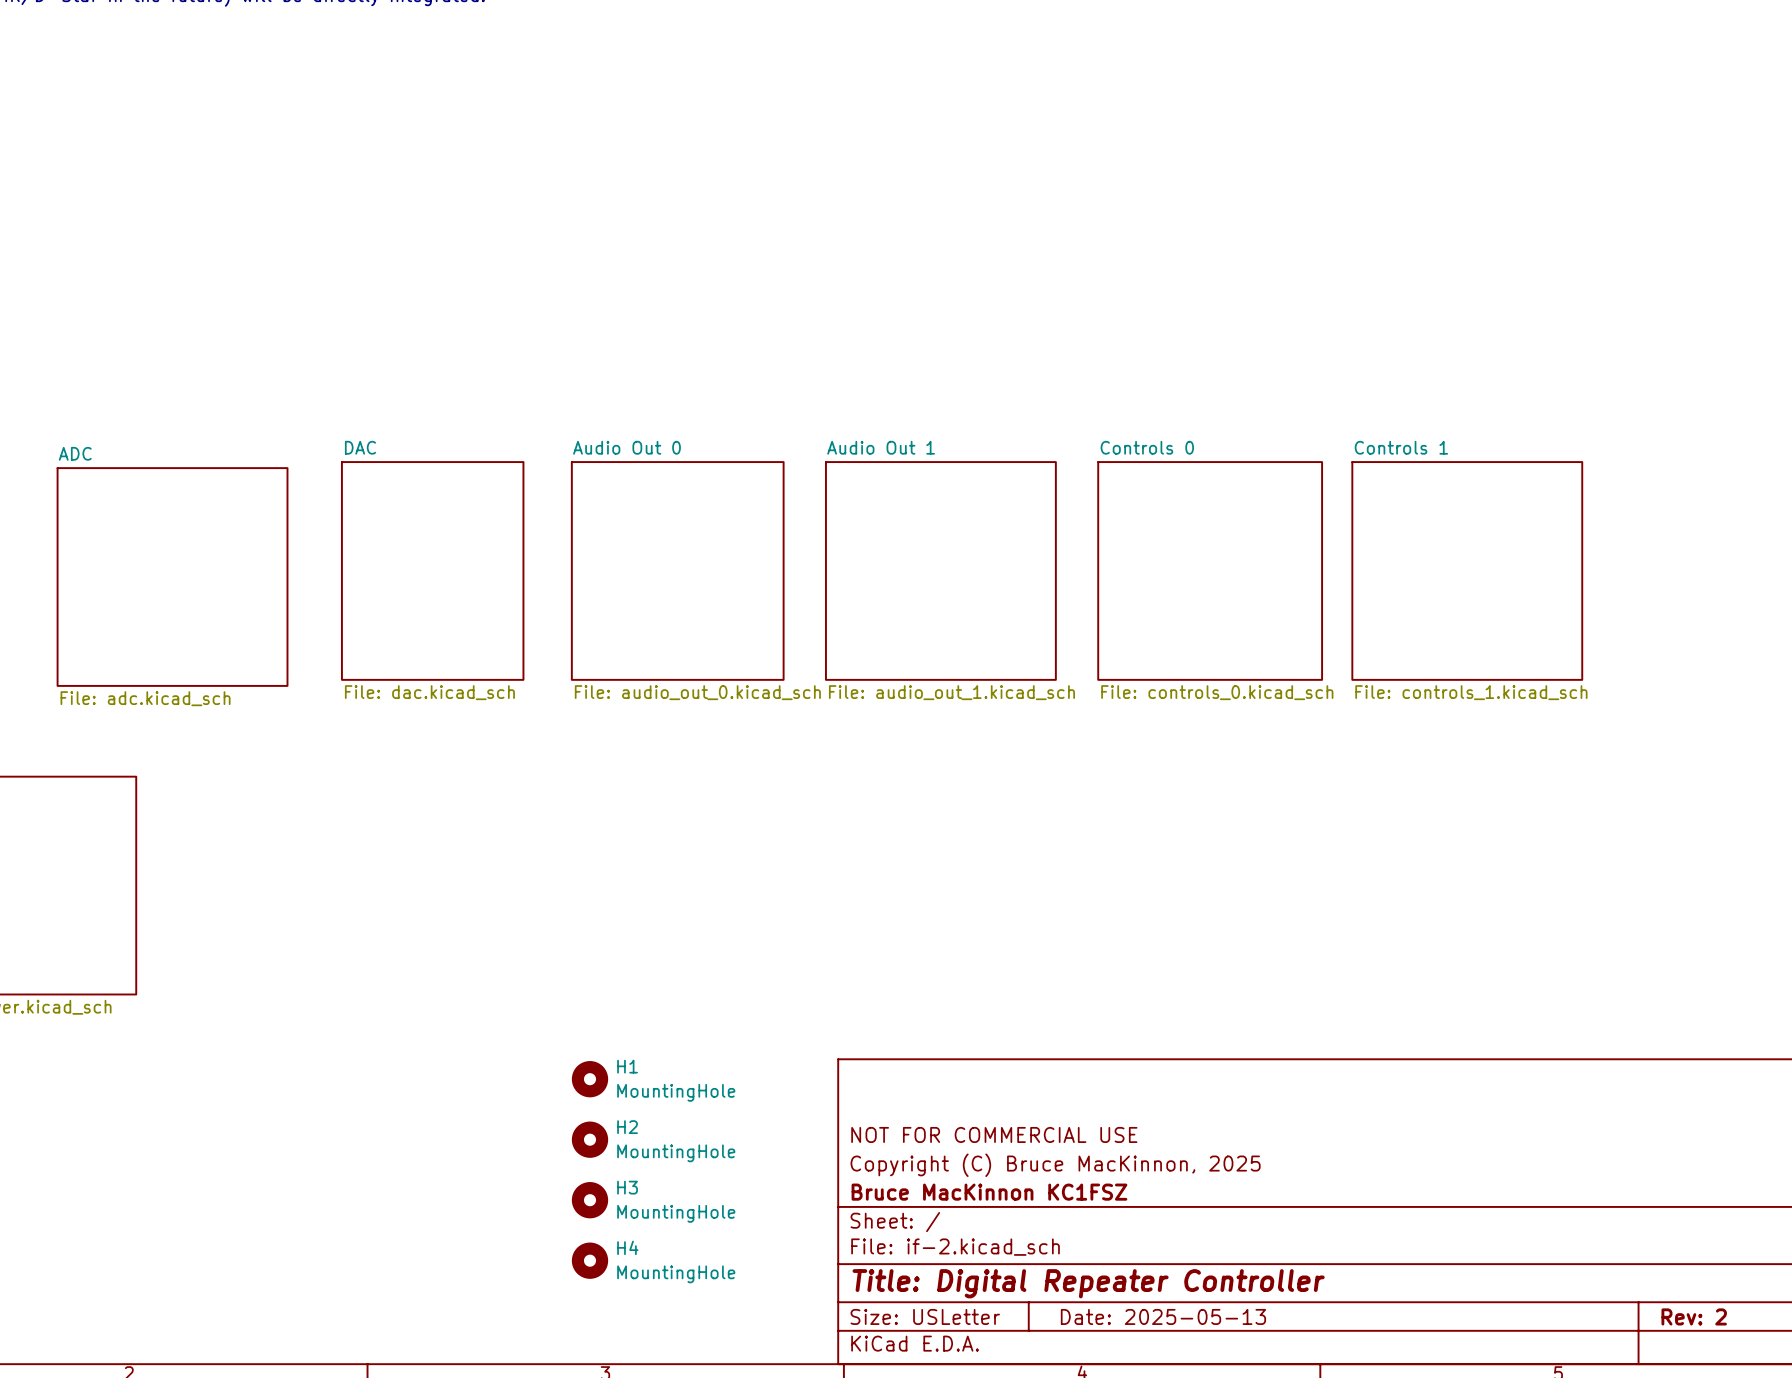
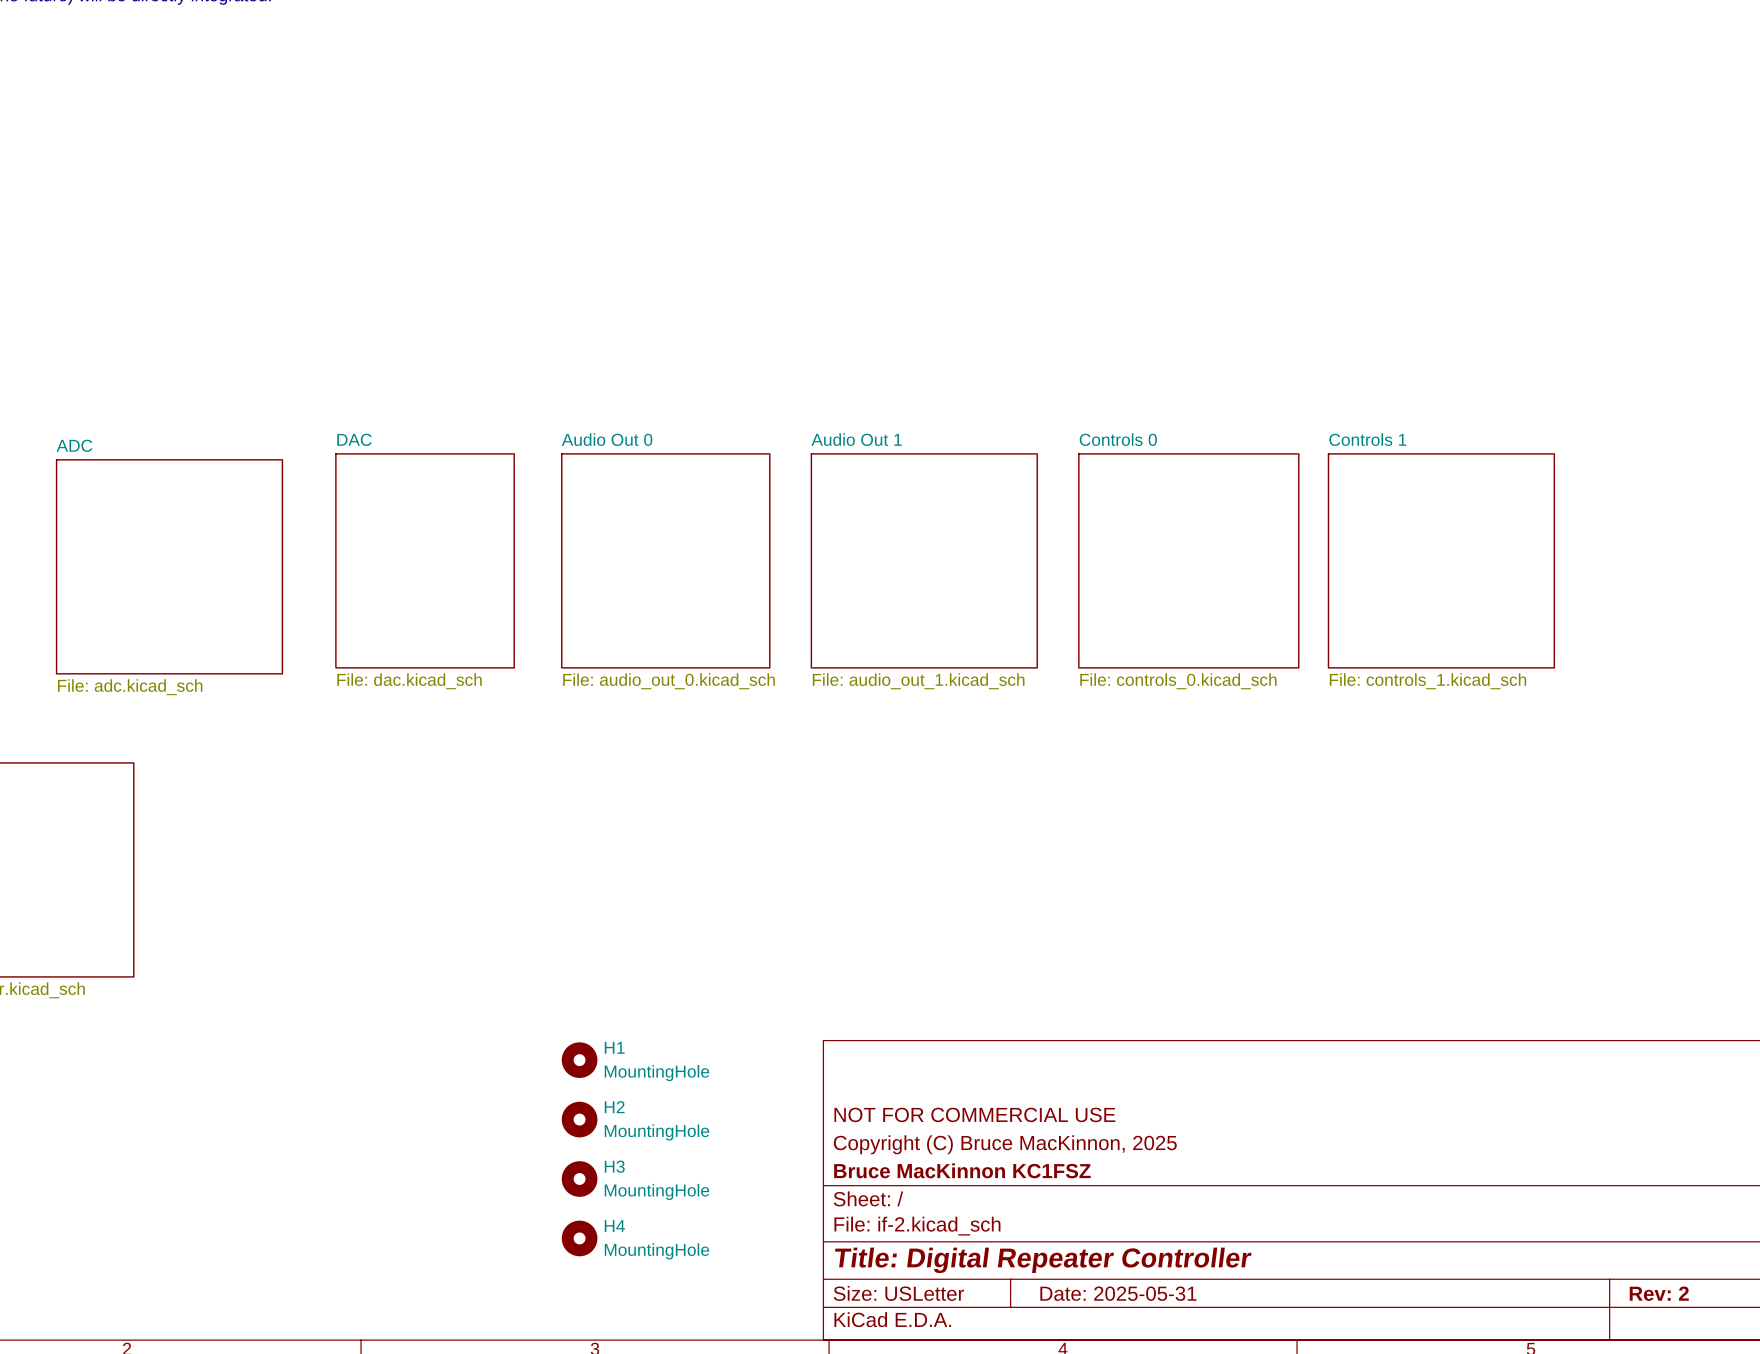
title block: Date: 2025-05-13 (1163, 1316) -> Date: 2025-05-31 (1118, 1293)

